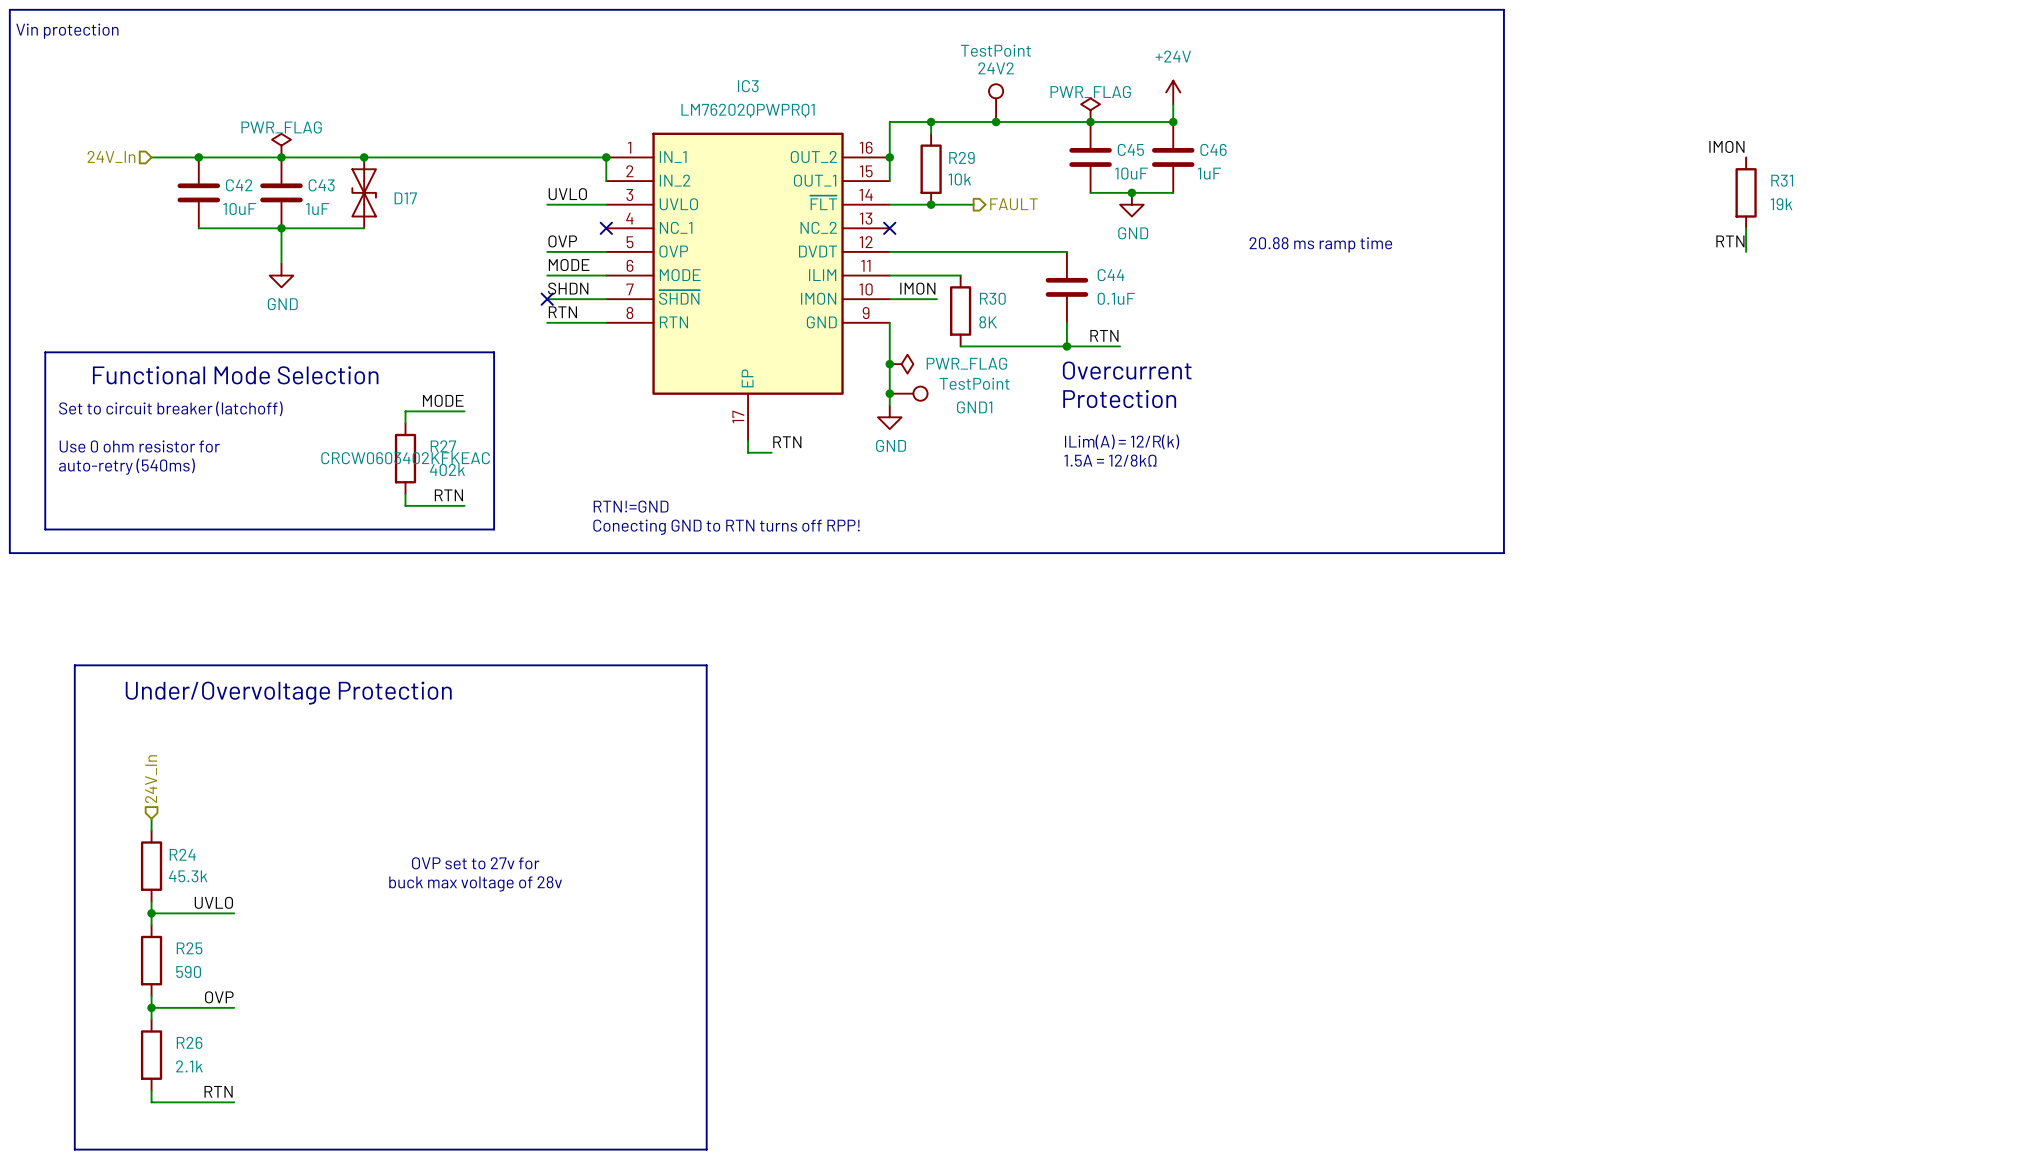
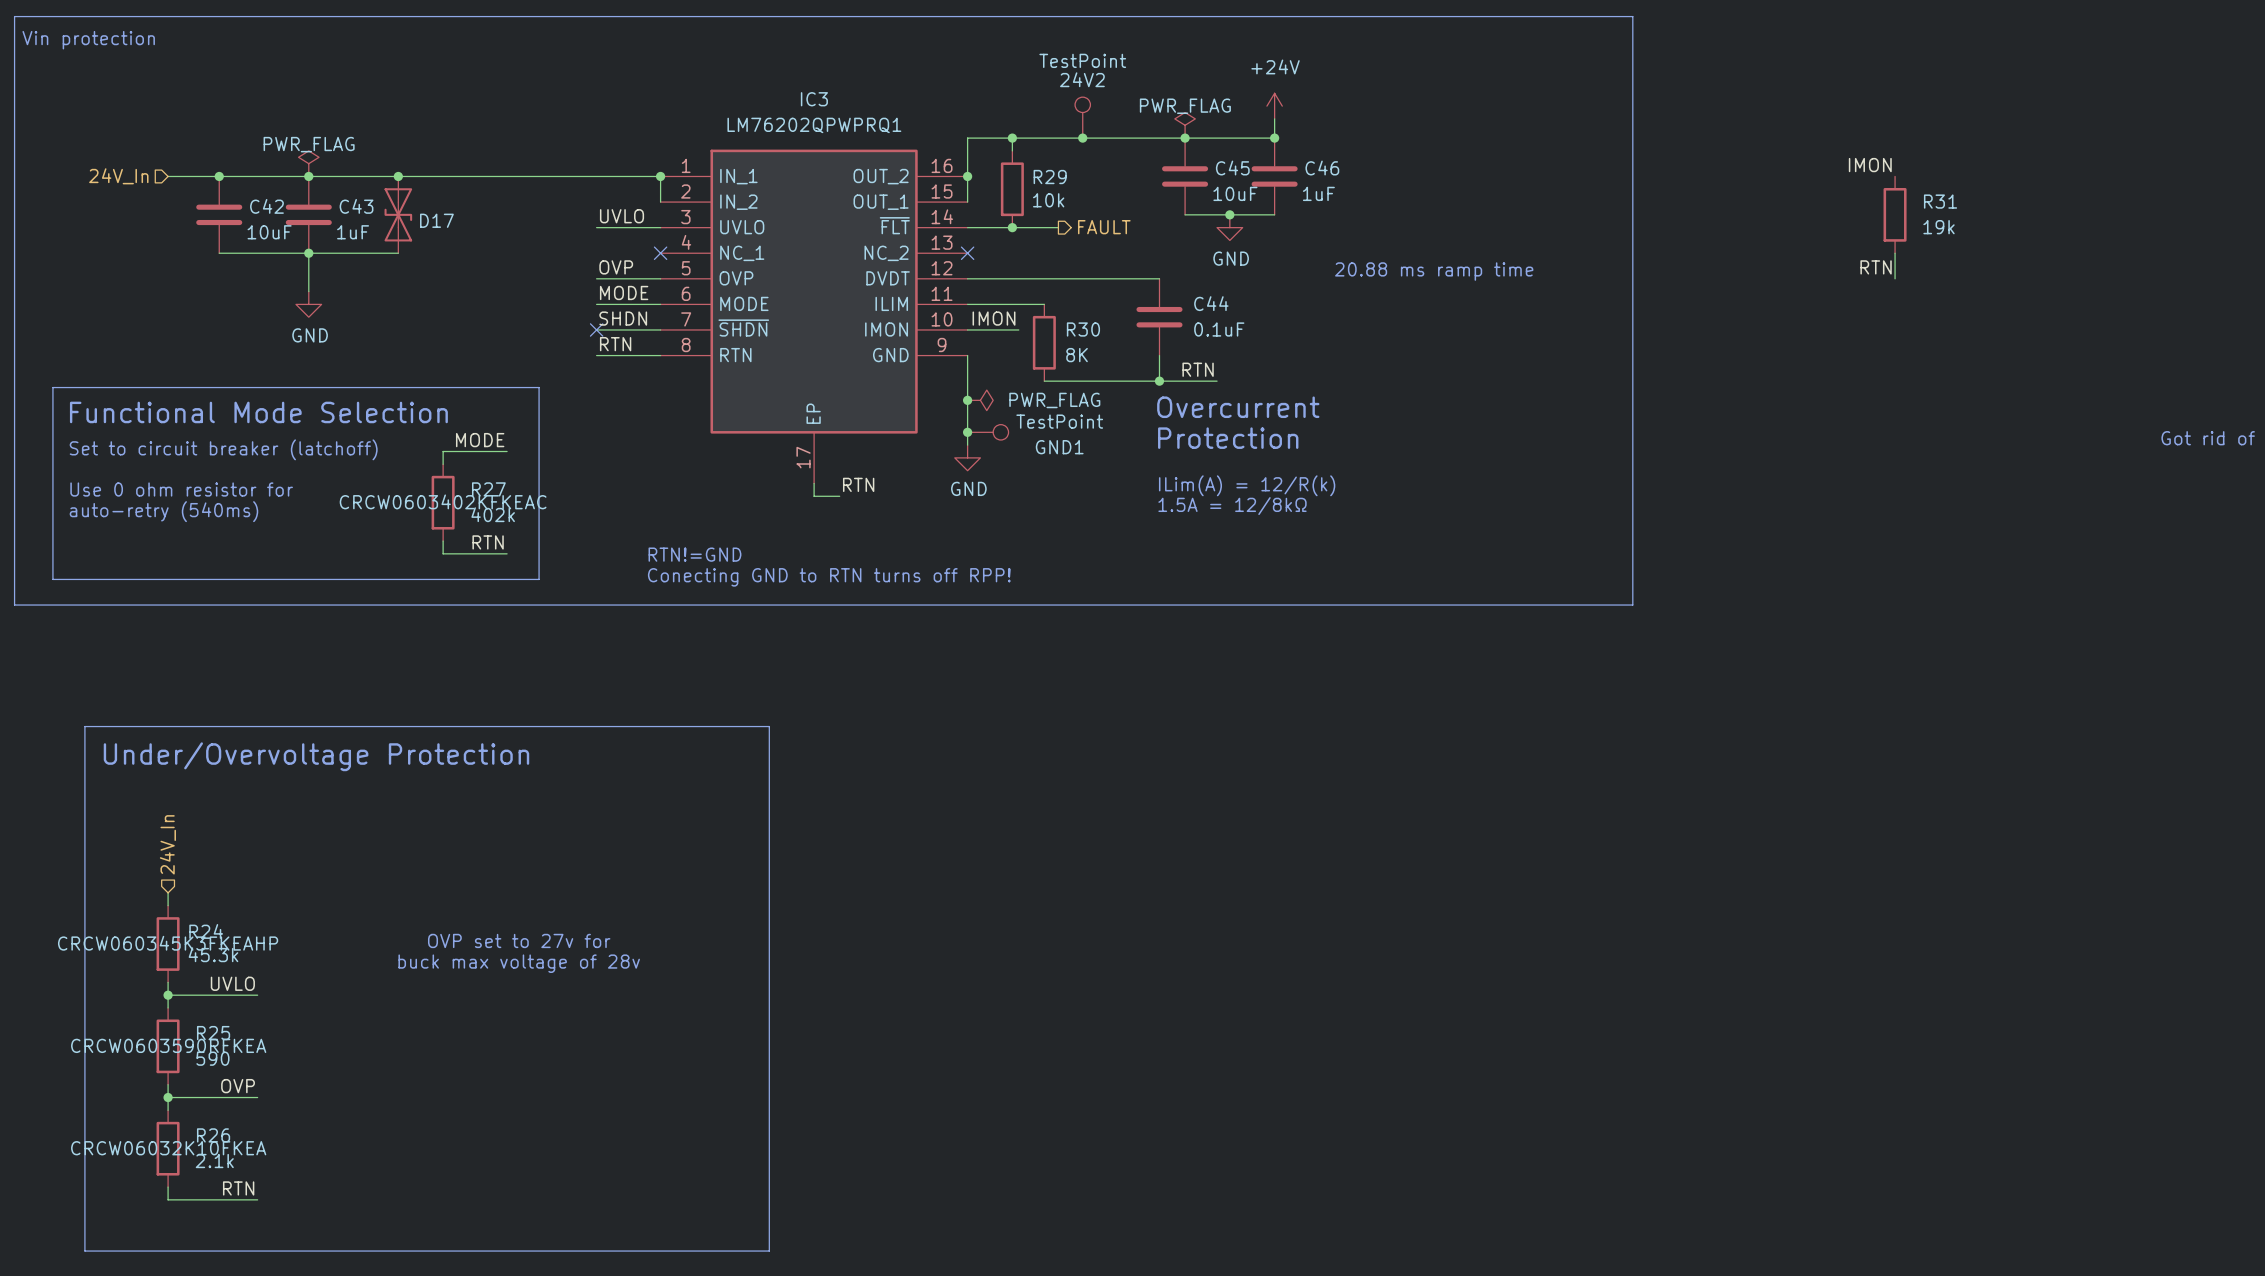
R24 text: none -> CRCW060345K3FKEAHP (168, 943)
R25 text: none -> CRCW0603590RFKEA (168, 1045)
R26 text: none -> CRCW06032K10FKEA (168, 1148)

